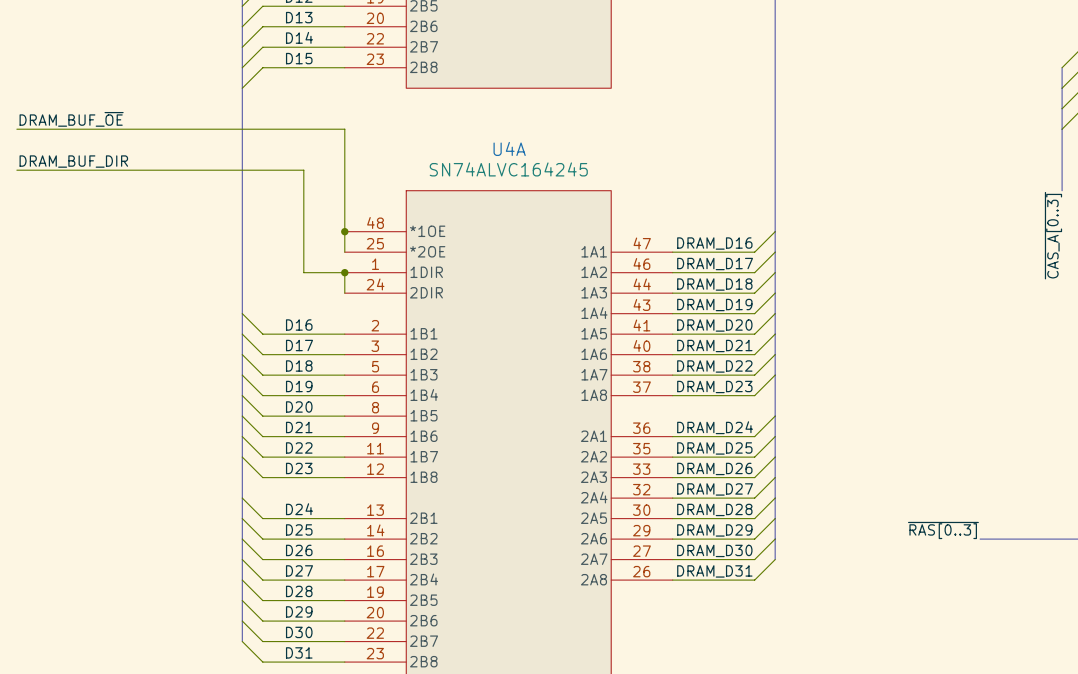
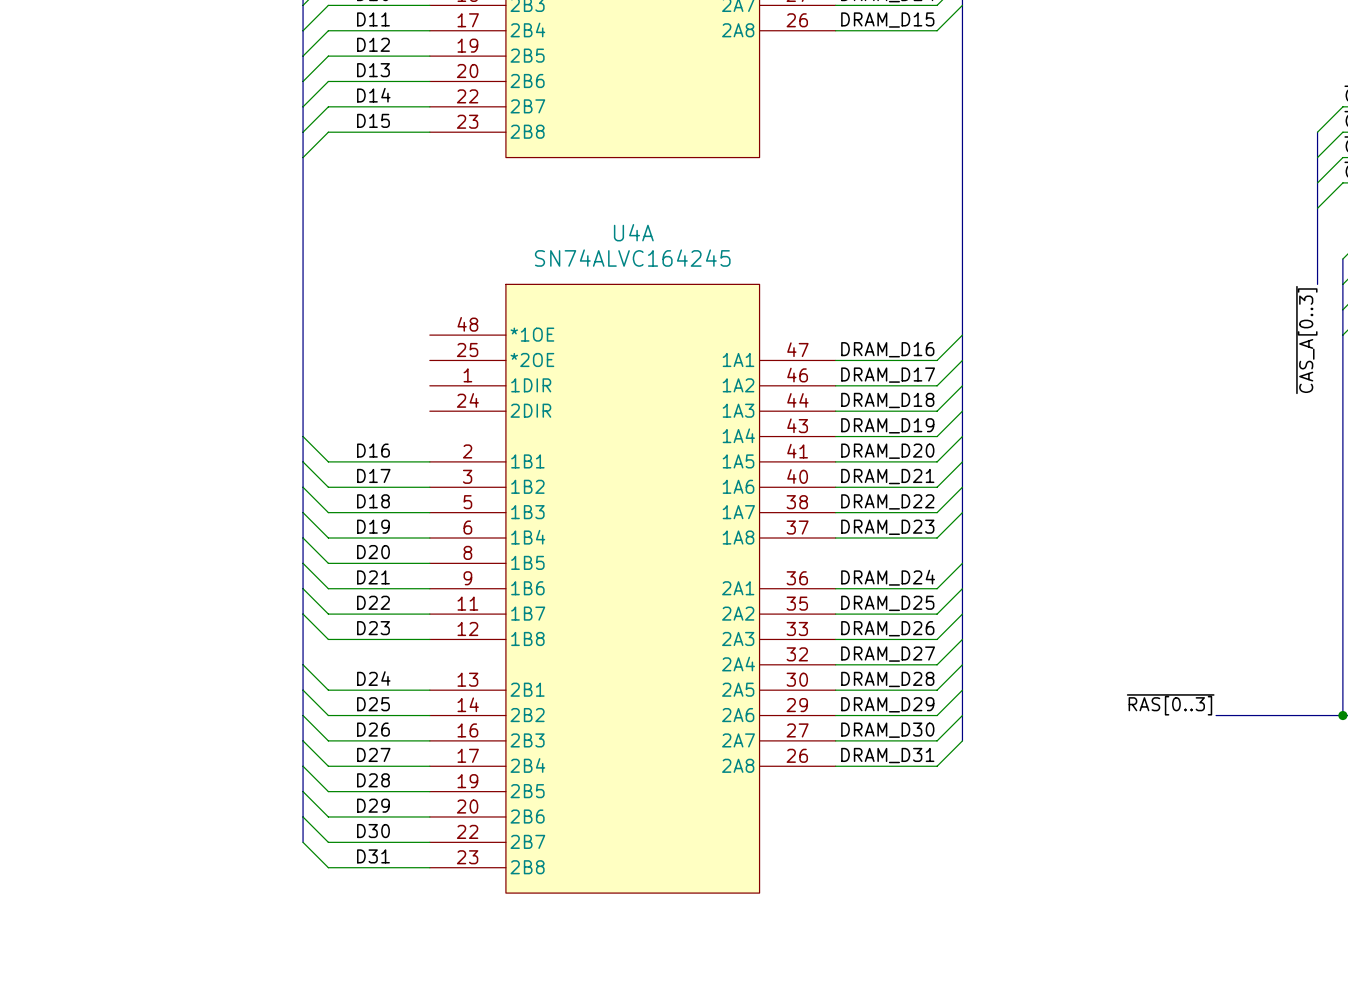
label: DRAM_BUF_~{OE} (71, 119) -> none
wire: (16, 129) (344, 129) (344, 252) -> none
label: DRAM_BUF_DIR (73, 161) -> none
wire: (16, 170) (303, 170) (303, 272) (344, 272) (344, 293) -> none
junction: (344, 231) -> none
junction: (344, 272) -> none

